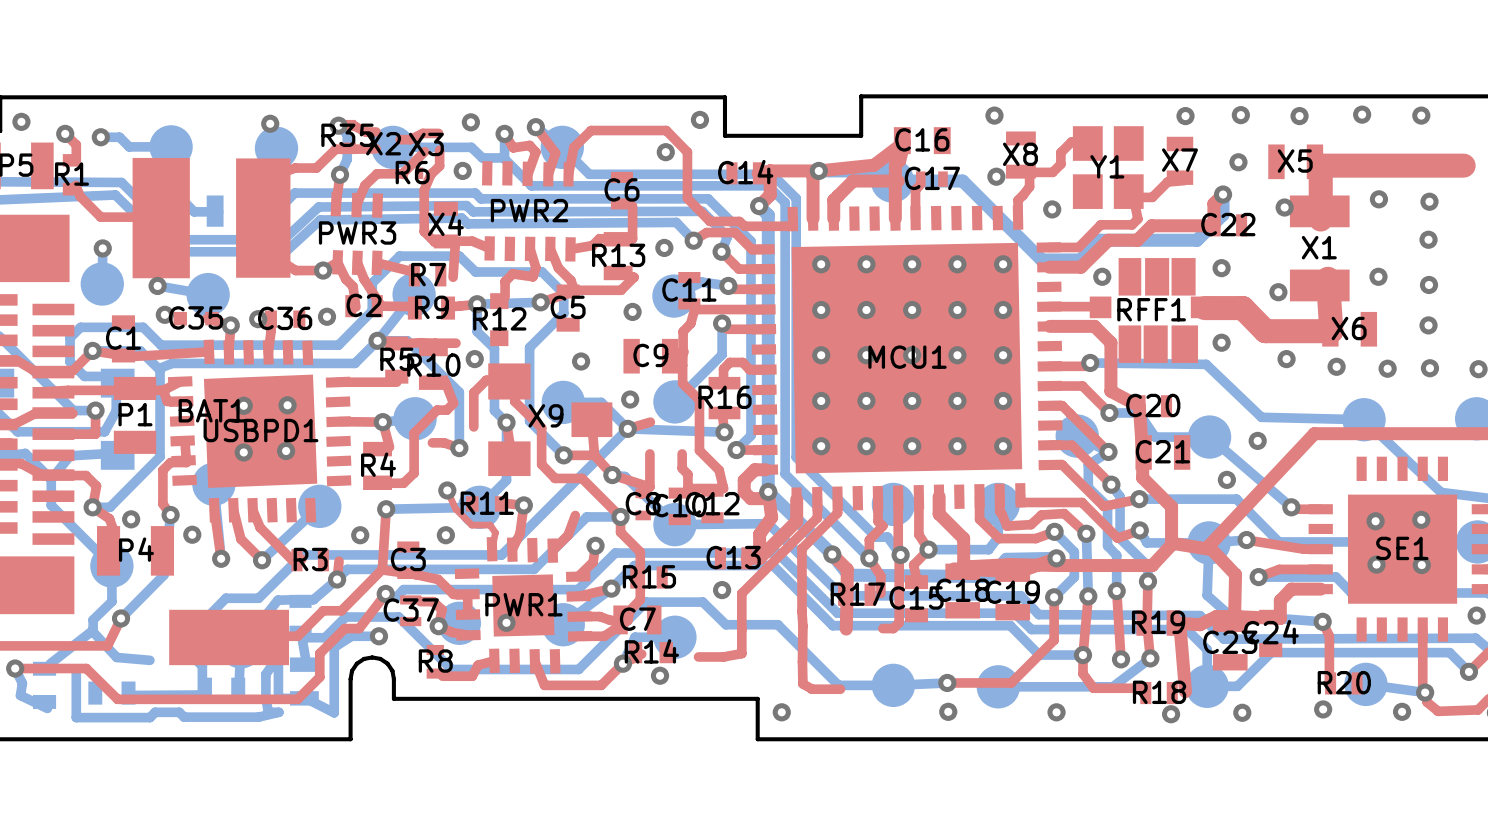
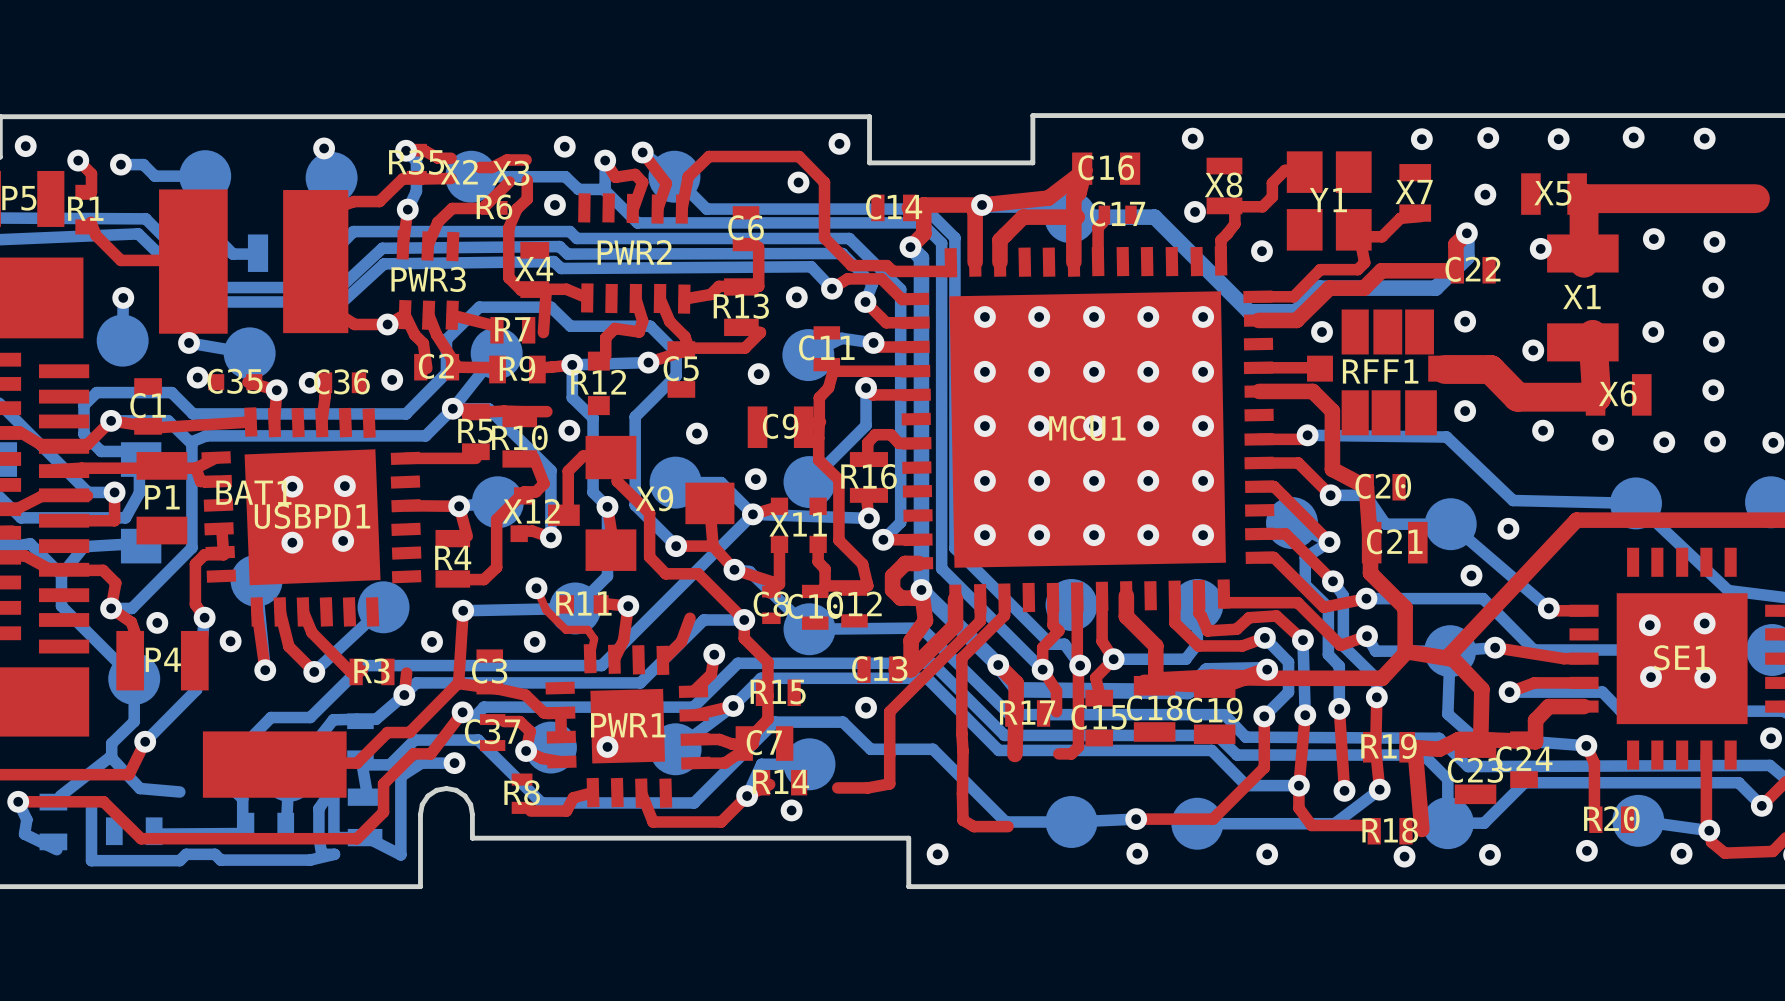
X12: none -> (545, 514)
X11: none -> (798, 525)

